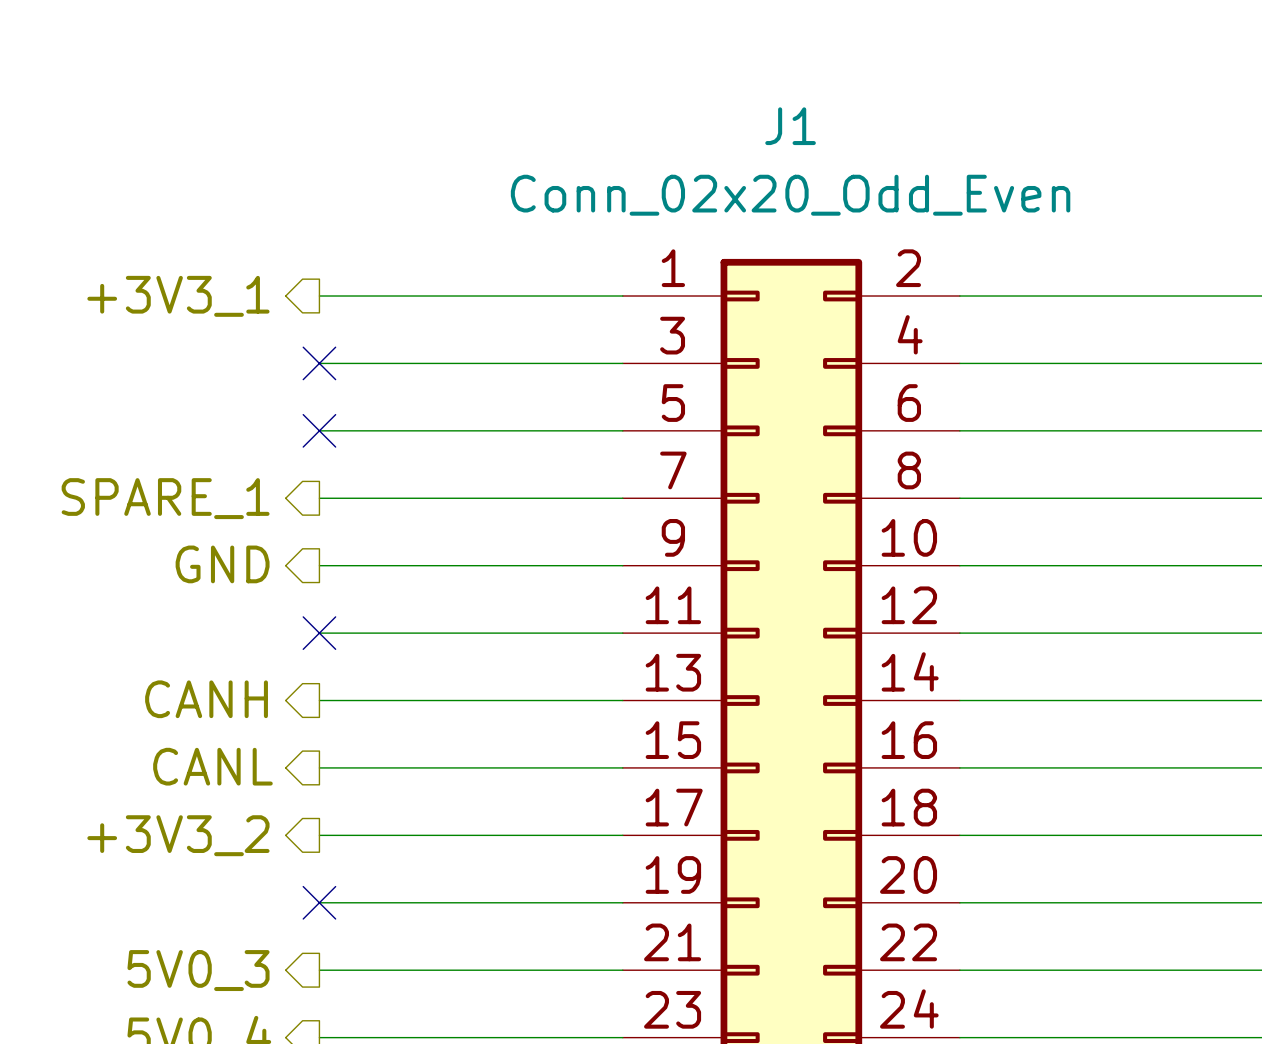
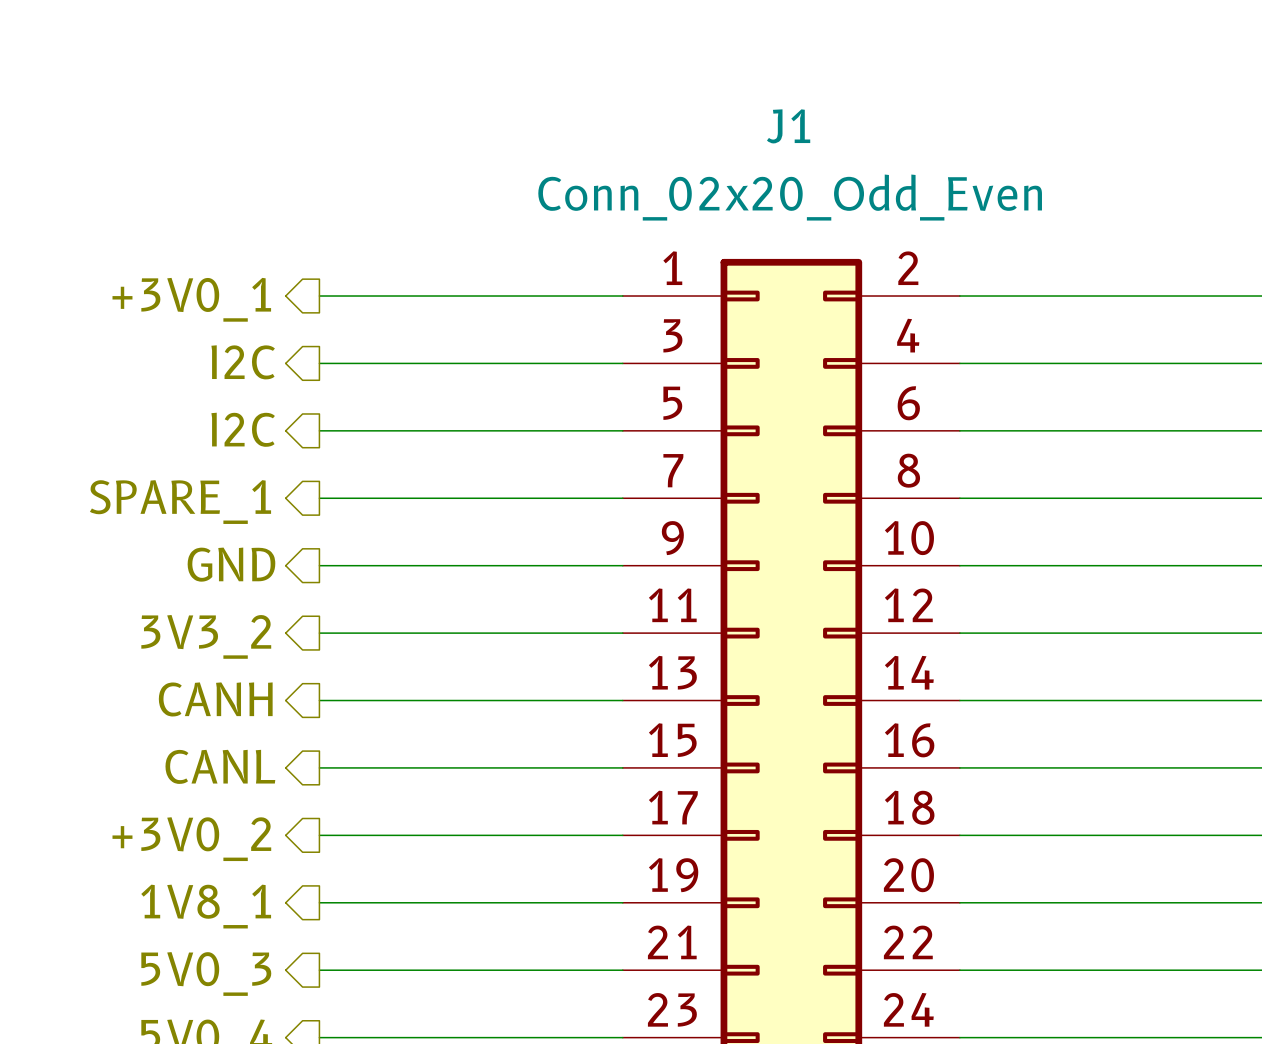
hierarchical label: +3V3_1 (178, 296) -> +3V0_1 (191, 299)
hierarchical label: none -> I2C (243, 362)
no-connect mark: (319, 363) -> none
hierarchical label: none -> I2C (243, 429)
no-connect mark: (319, 430) -> none
hierarchical label: none -> 3V3_2 (206, 636)
no-connect mark: (319, 633) -> none
hierarchical label: +3V3_2 (178, 835) -> +3V0_2 (191, 839)
no-connect mark: (319, 902) -> none
hierarchical label: none -> 1V8_1 (206, 906)

